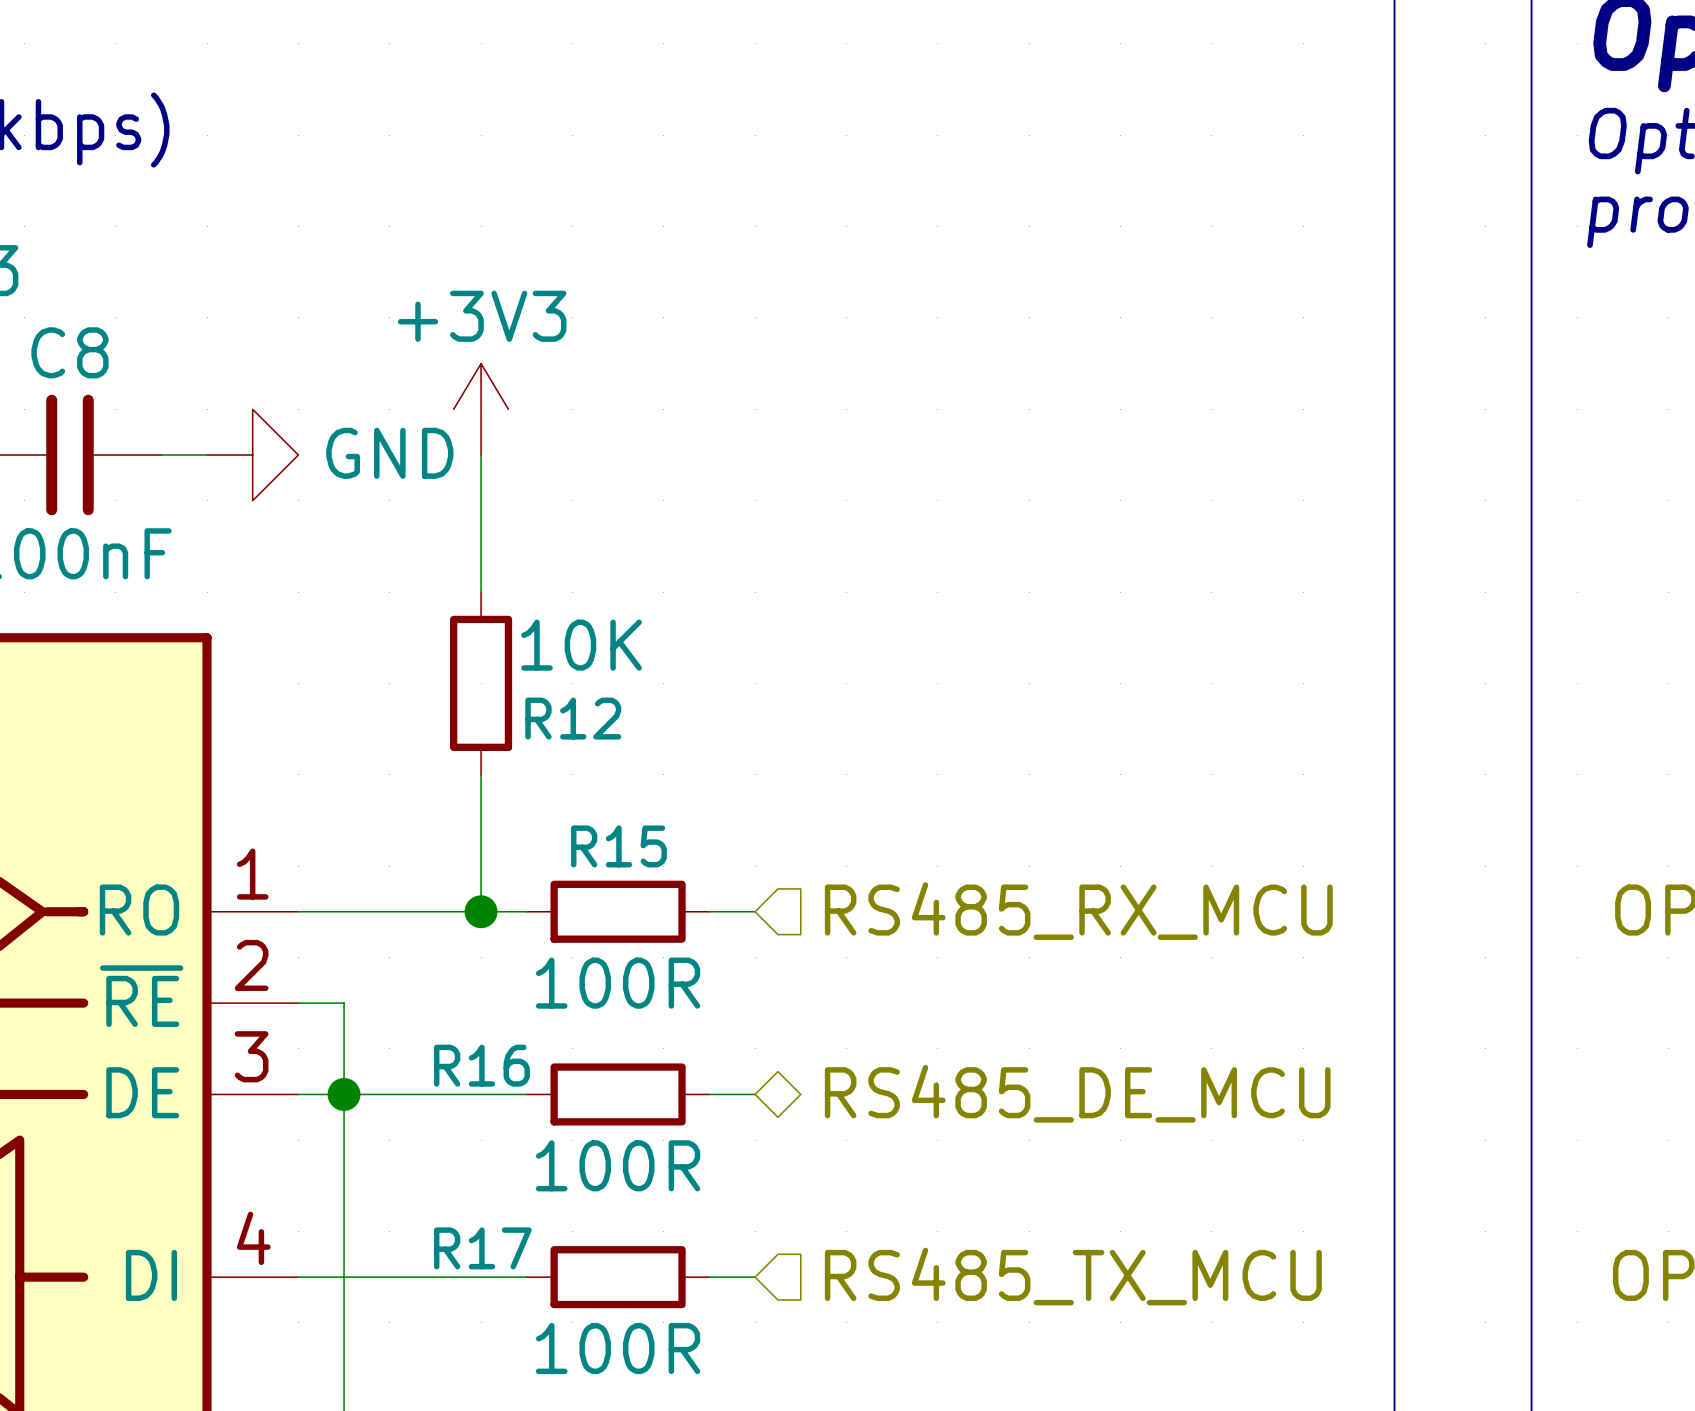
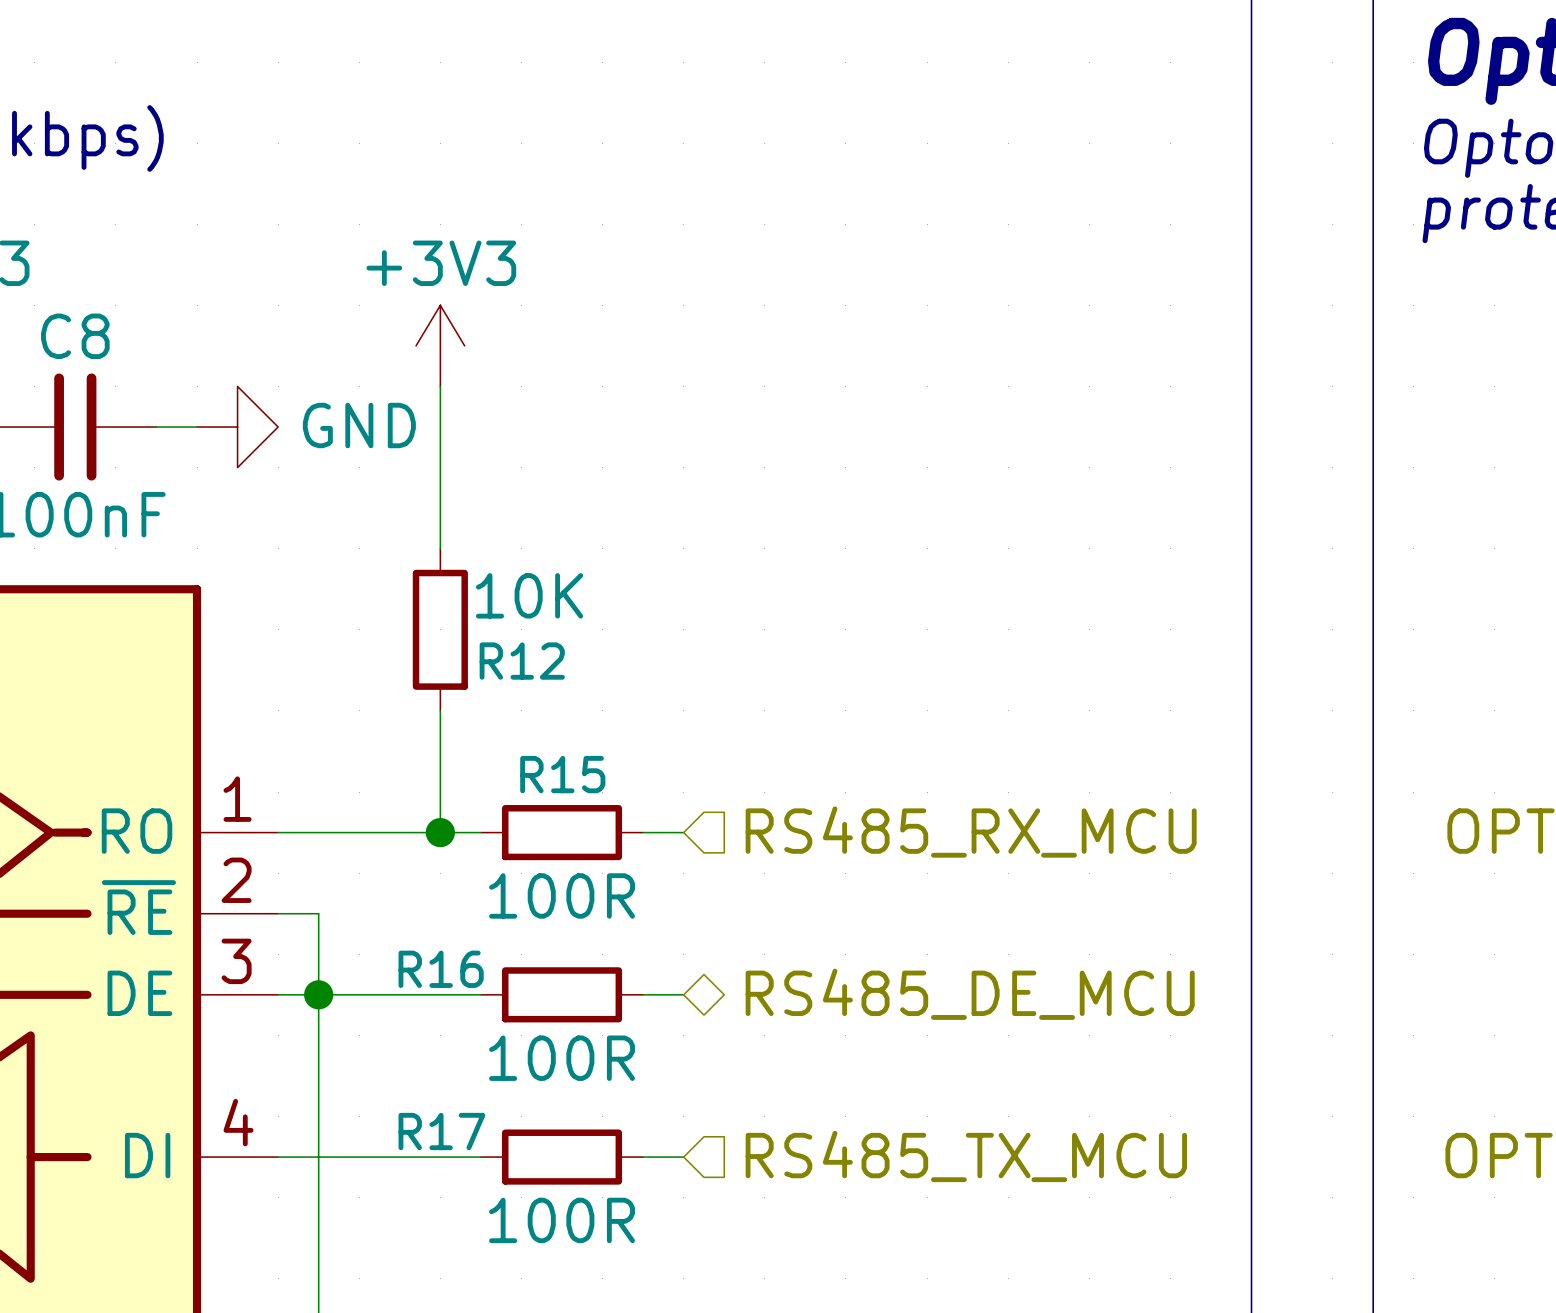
power symbol position: +3V3 (481, 409) -> +3V3 (440, 345)

